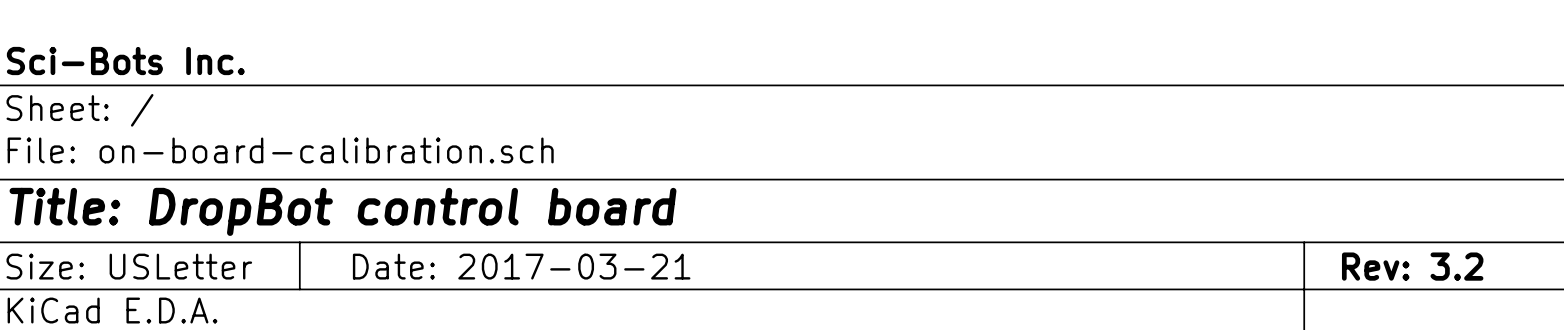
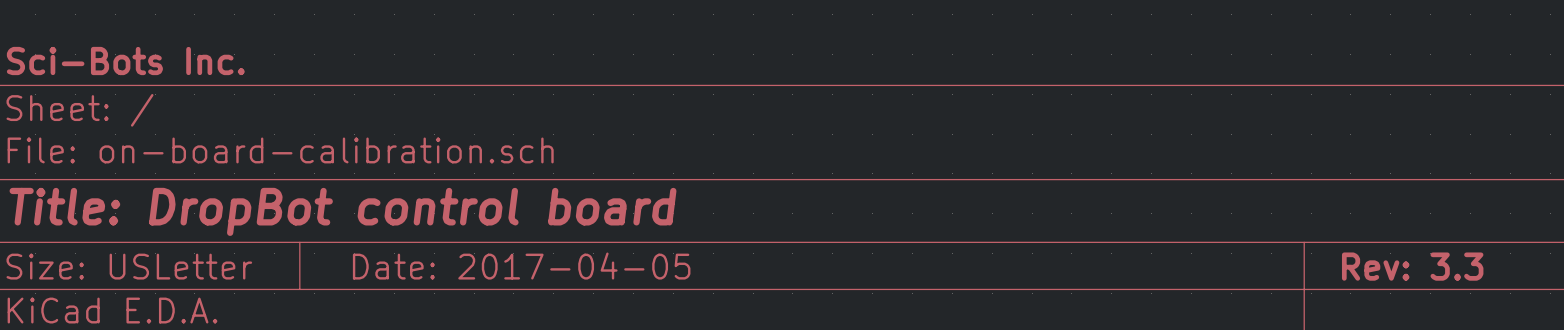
title block: Date: 2017-03-21 (521, 266) -> Date: 2017-04-05 (521, 266)
title block: Rev: 3.2 (1412, 266) -> Rev: 3.3 (1412, 266)

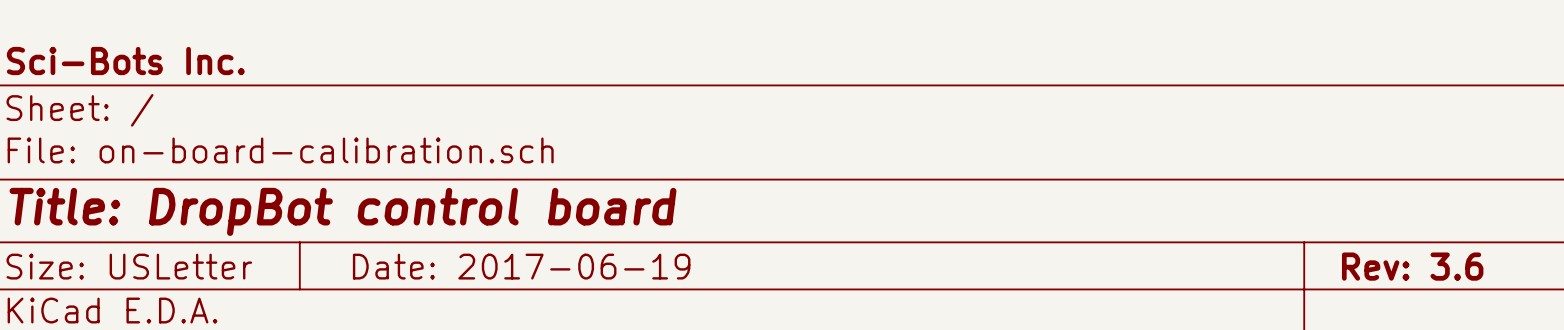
title block: Date: 2017-04-05 (521, 266) -> Date: 2017-06-19 (521, 266)
title block: Rev: 3.3 (1412, 266) -> Rev: 3.6 (1412, 266)

